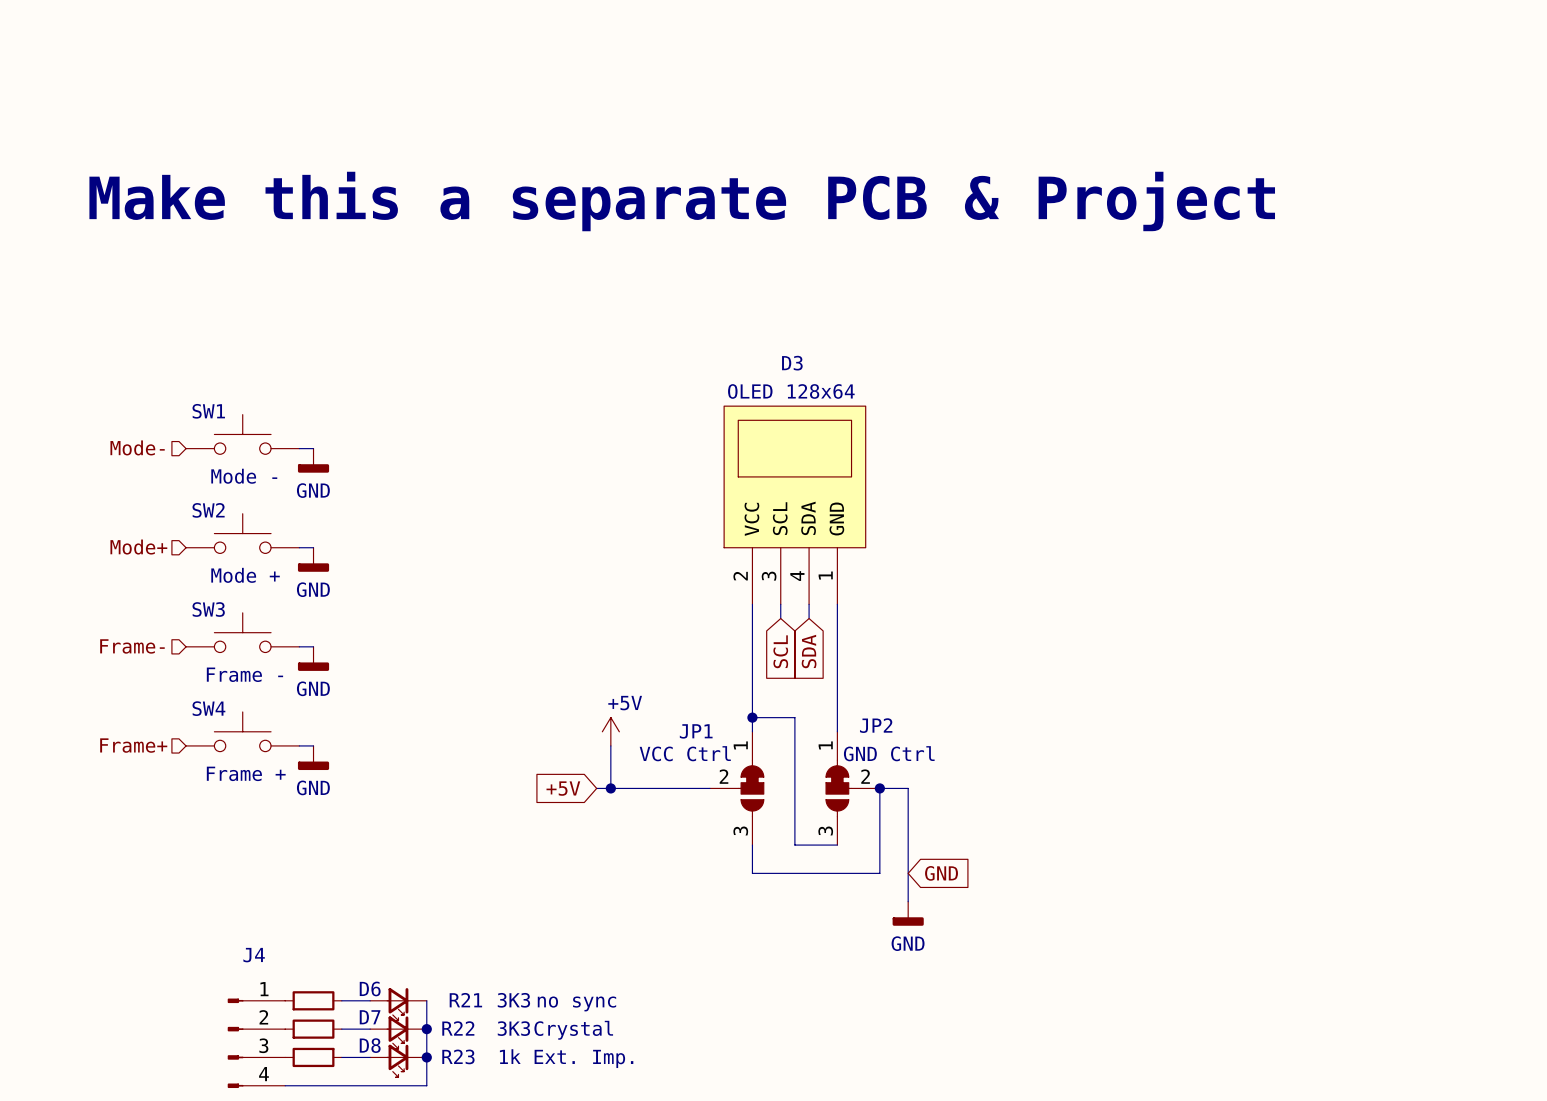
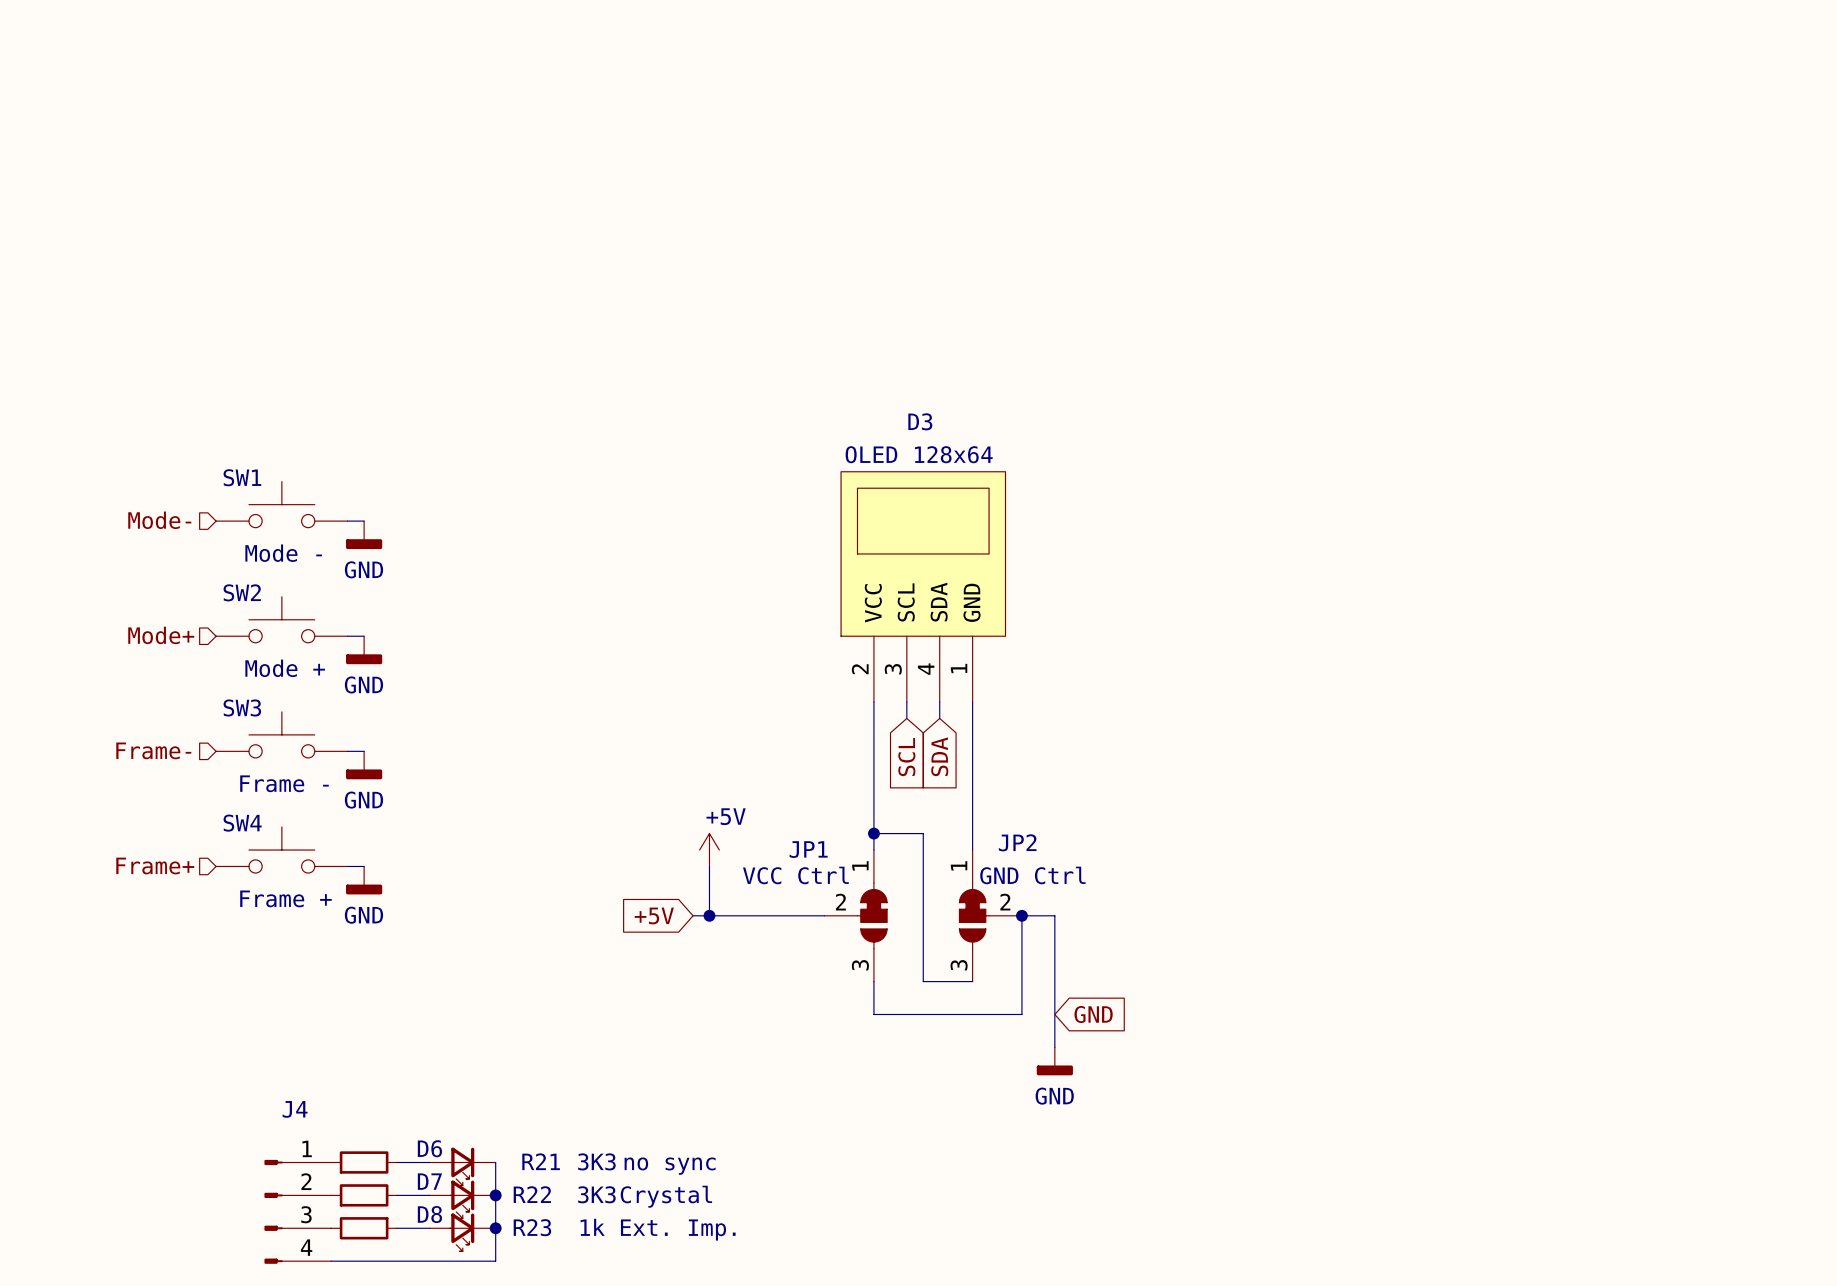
text: Make this a separate PCB & Project (682, 201) -> none

